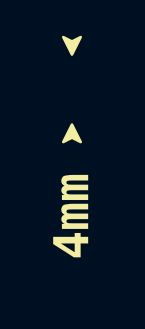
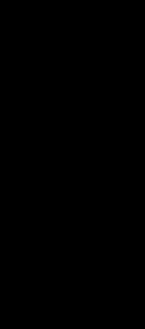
drawing: [61, 35, 83, 56] -> none
drawing: [61, 123, 83, 144] -> none
text: 4mm (70, 216) -> none

